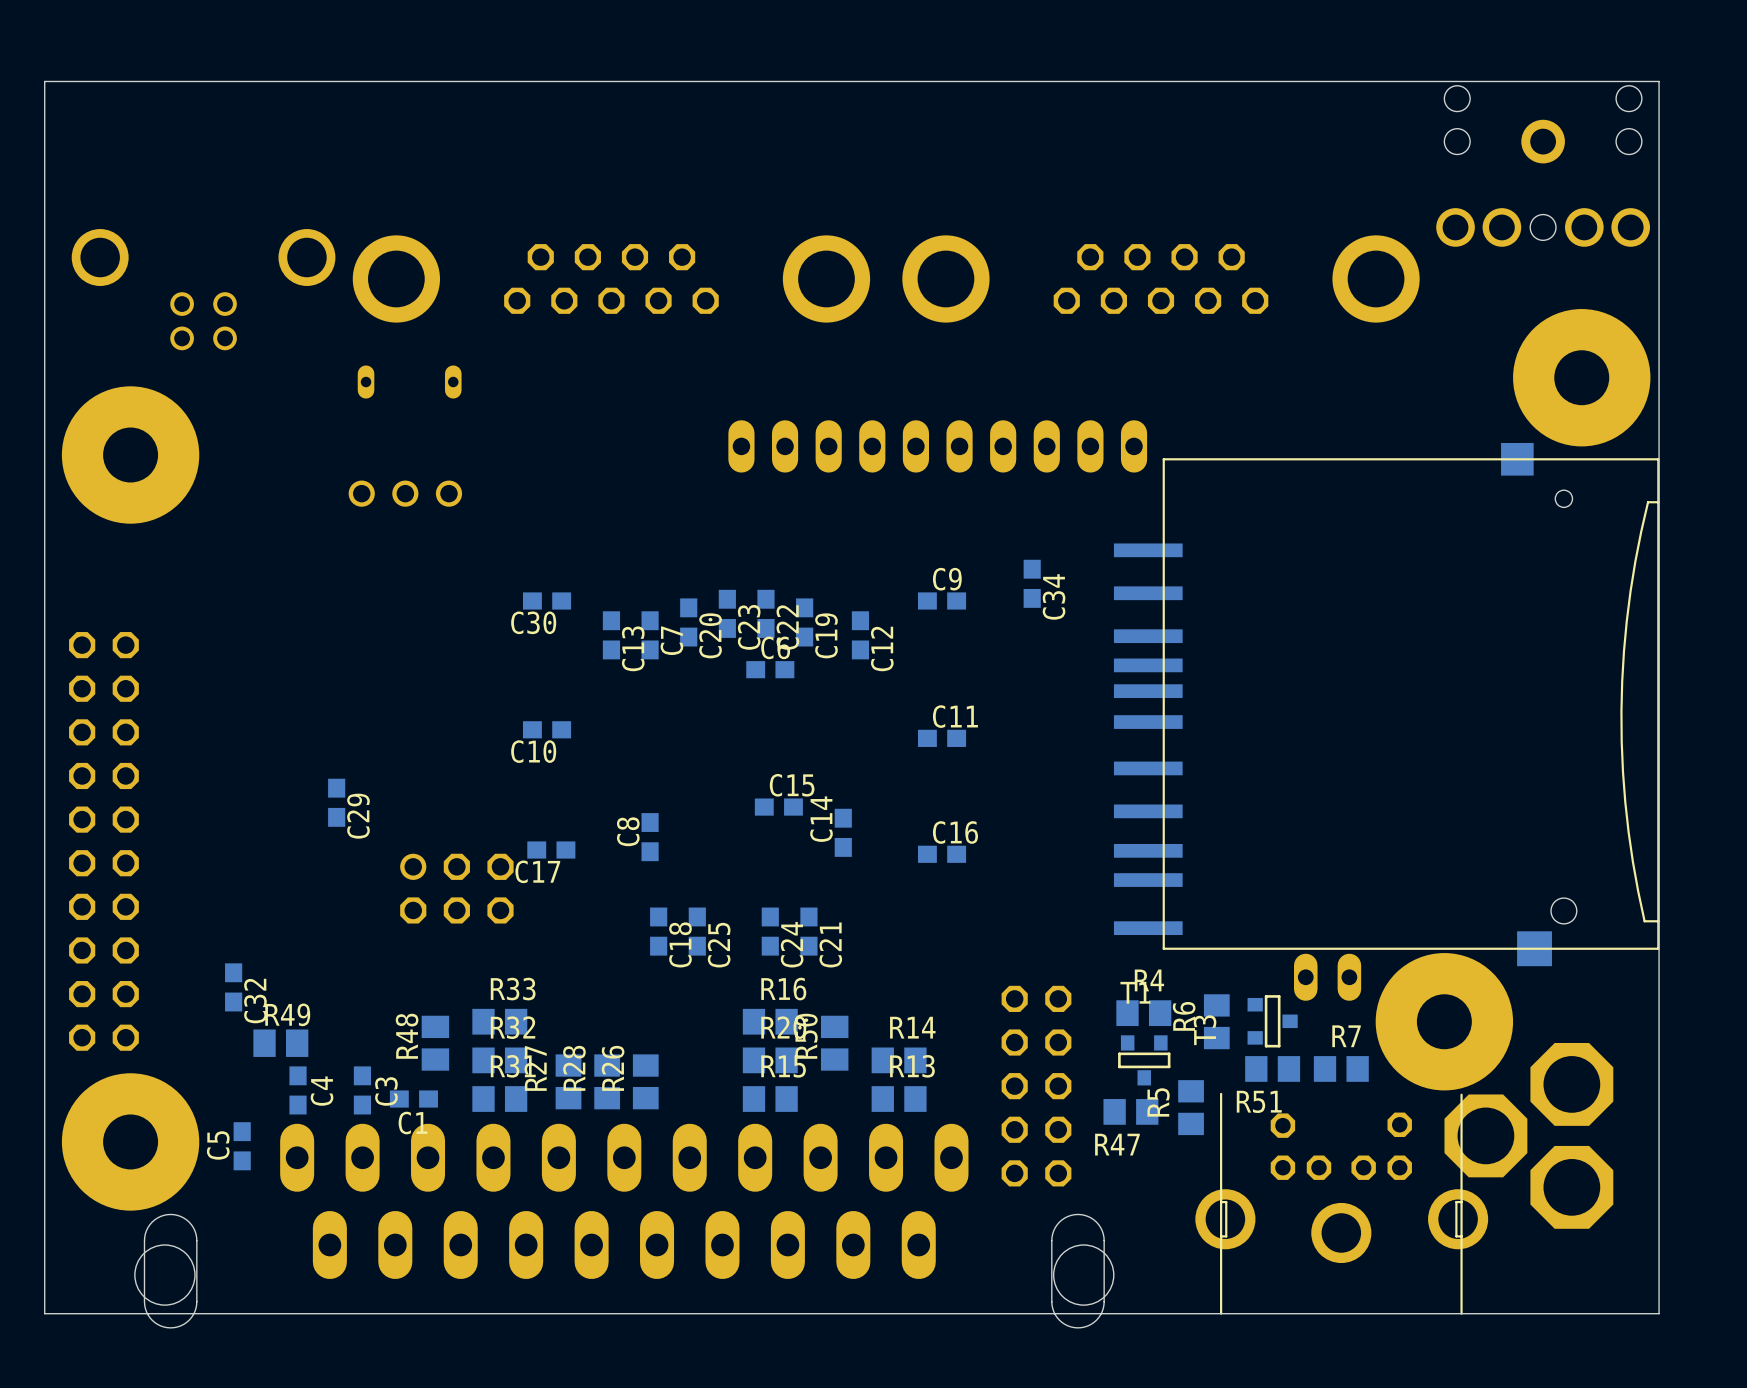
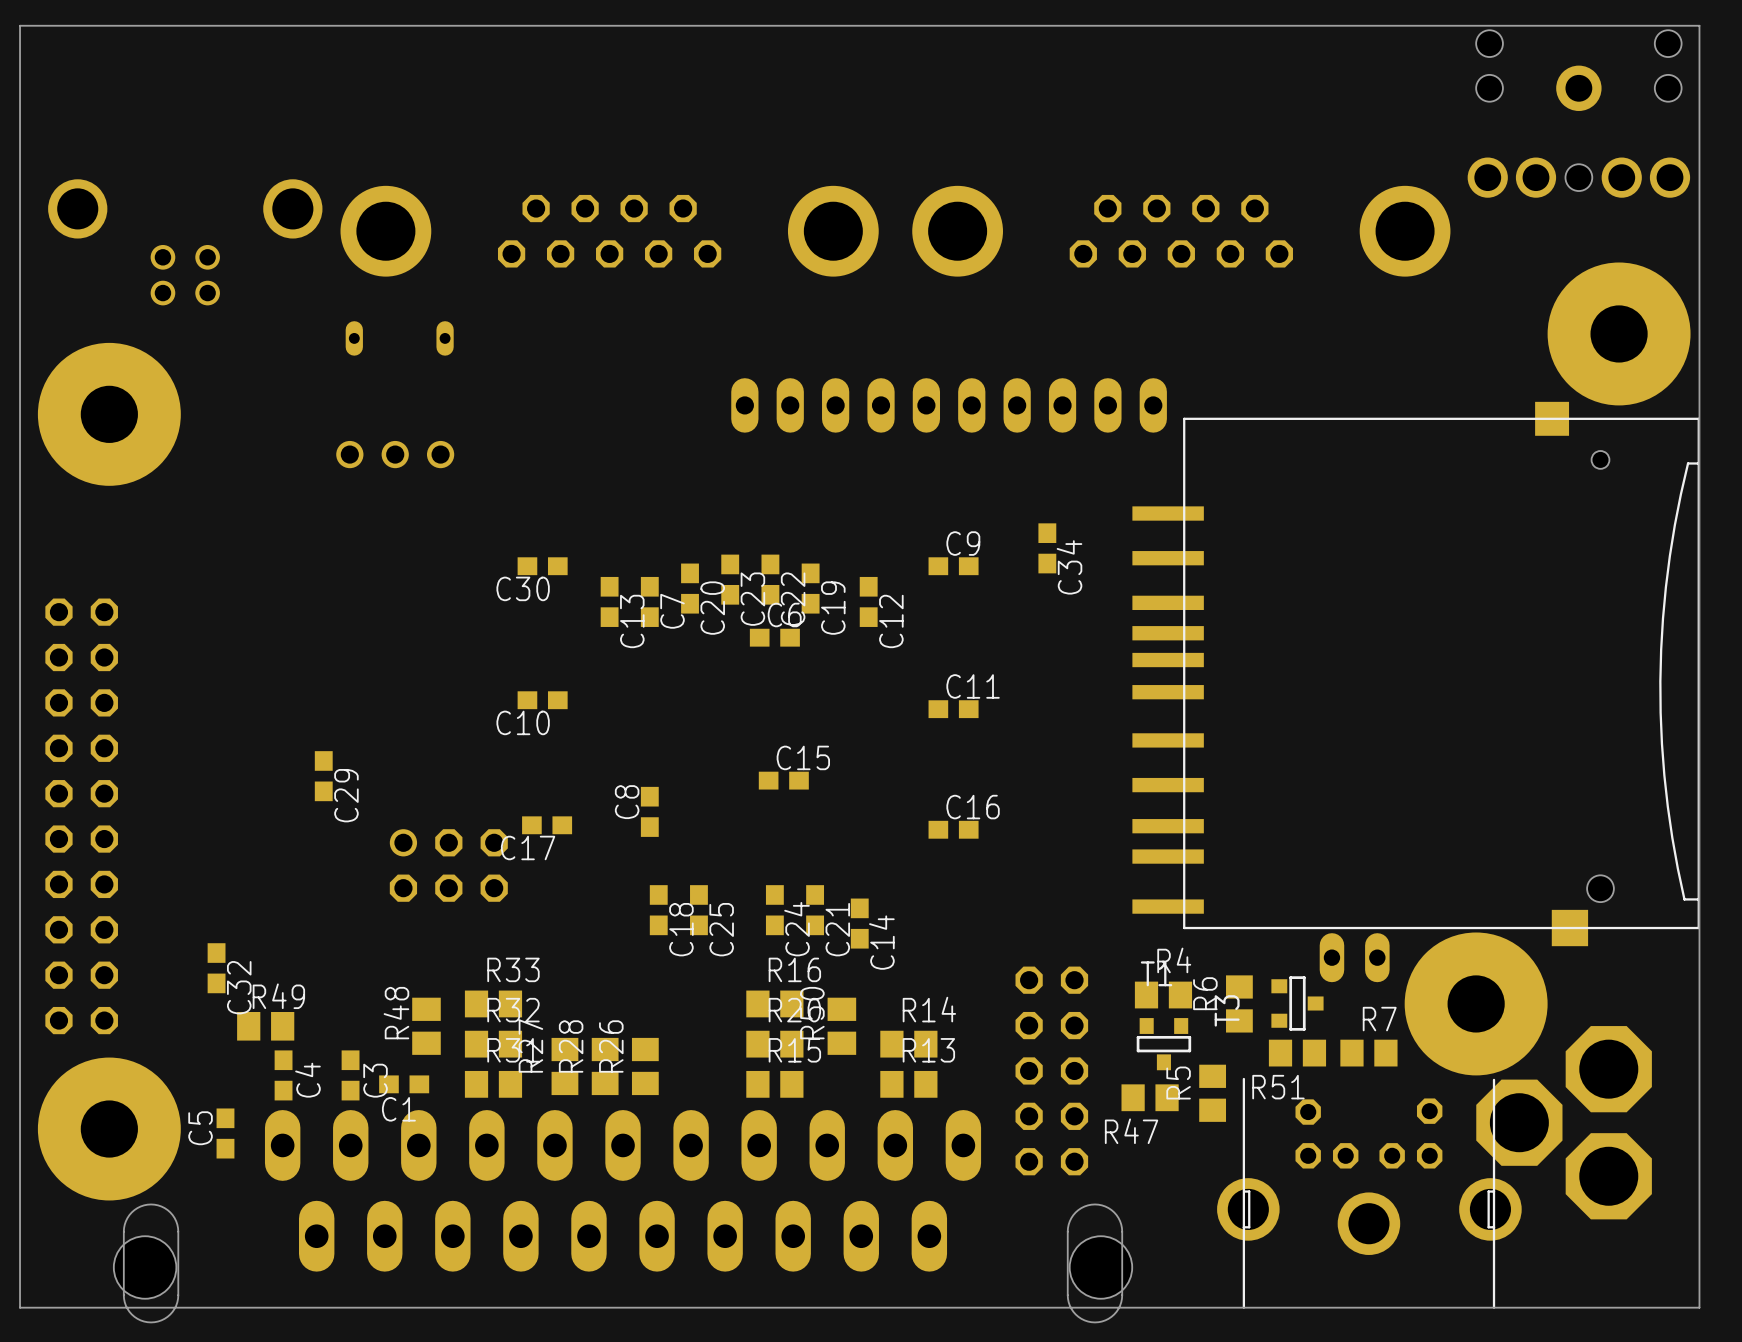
C14 name position: C14 (821, 819) -> C14 (881, 942)
C14 position: (843, 832) -> (859, 923)

